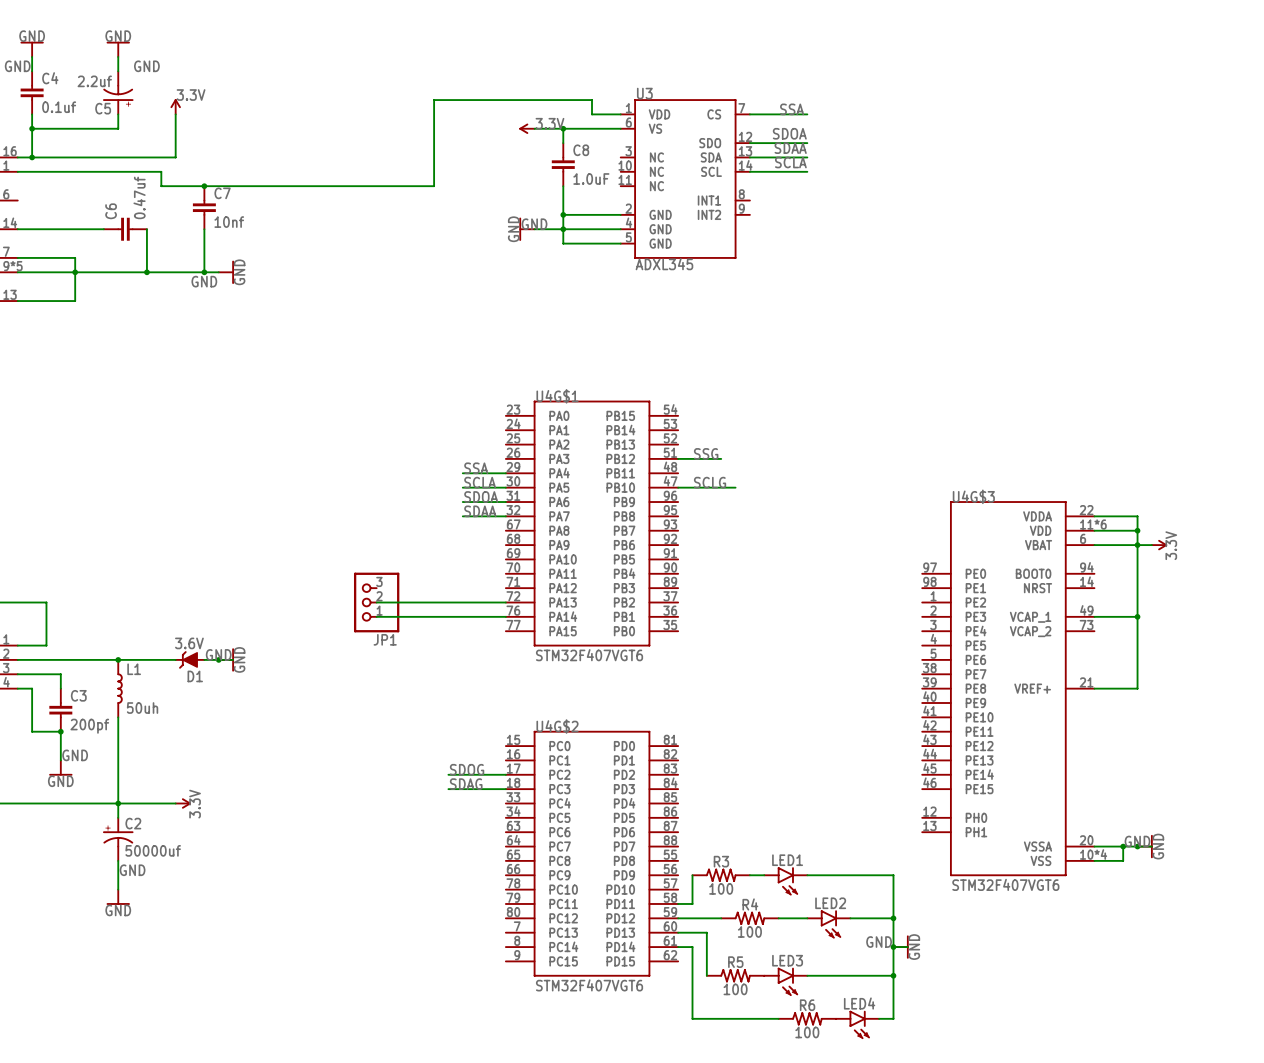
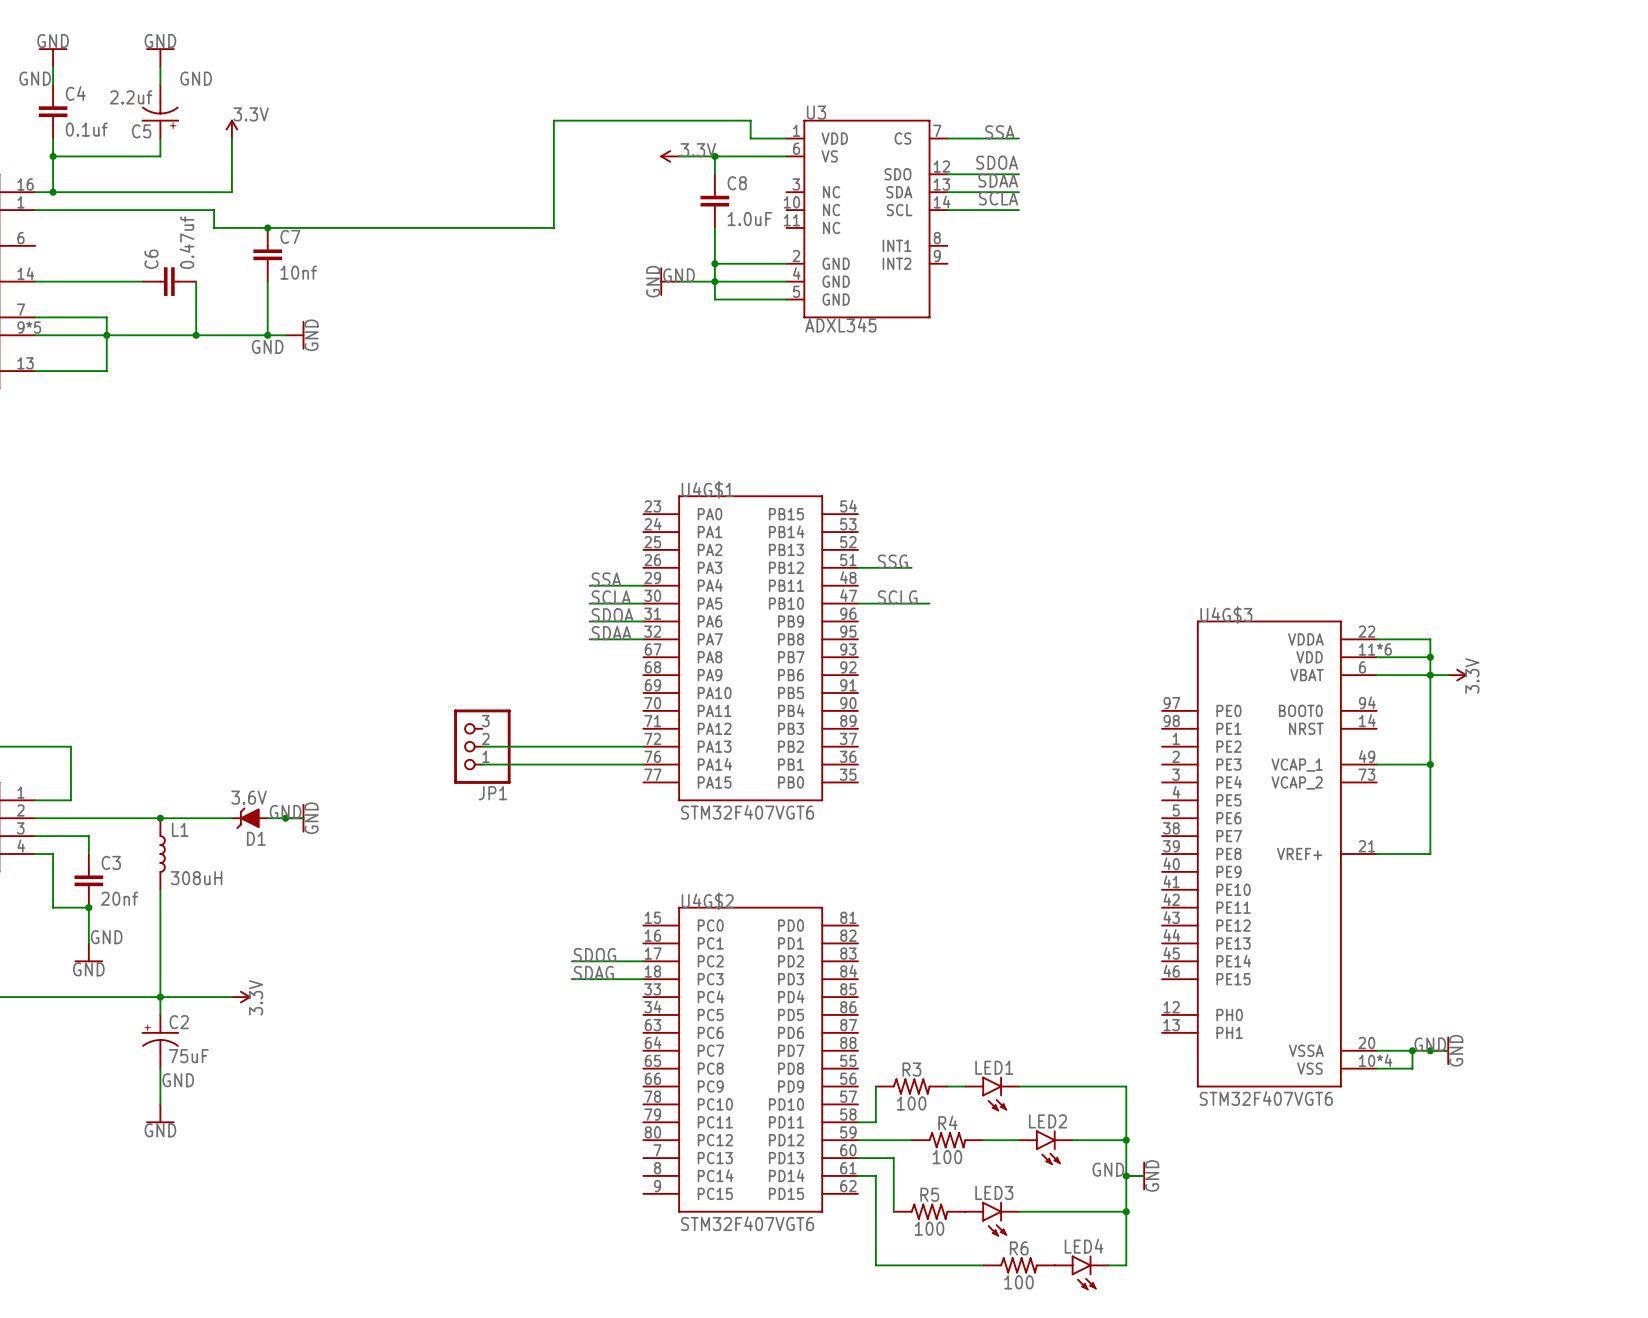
L1 value: 50uh (142, 708) -> 308uH (196, 878)
C3 value: 200pf (89, 726) -> 20nf (119, 898)
C2 value: 50000uf (153, 850) -> 75uF (188, 1056)

